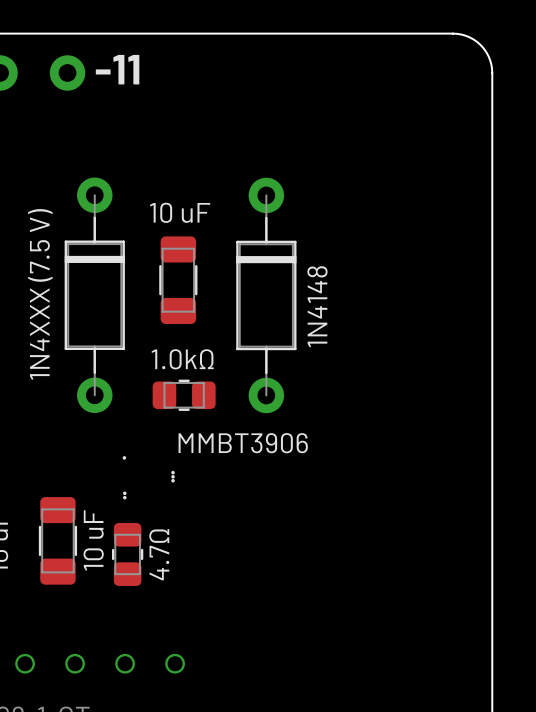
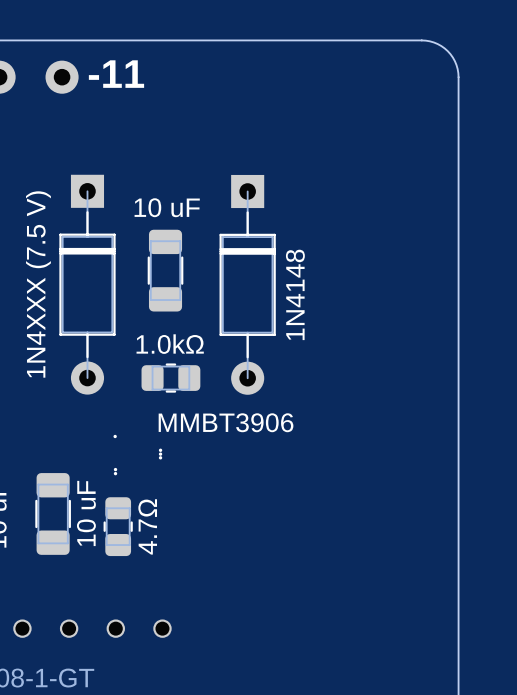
1N4XXX (7.5 V) footprint: [64, 177, 125, 414] -> [59, 174, 116, 395]
1N4148 footprint: [236, 177, 297, 414] -> [219, 174, 276, 395]

